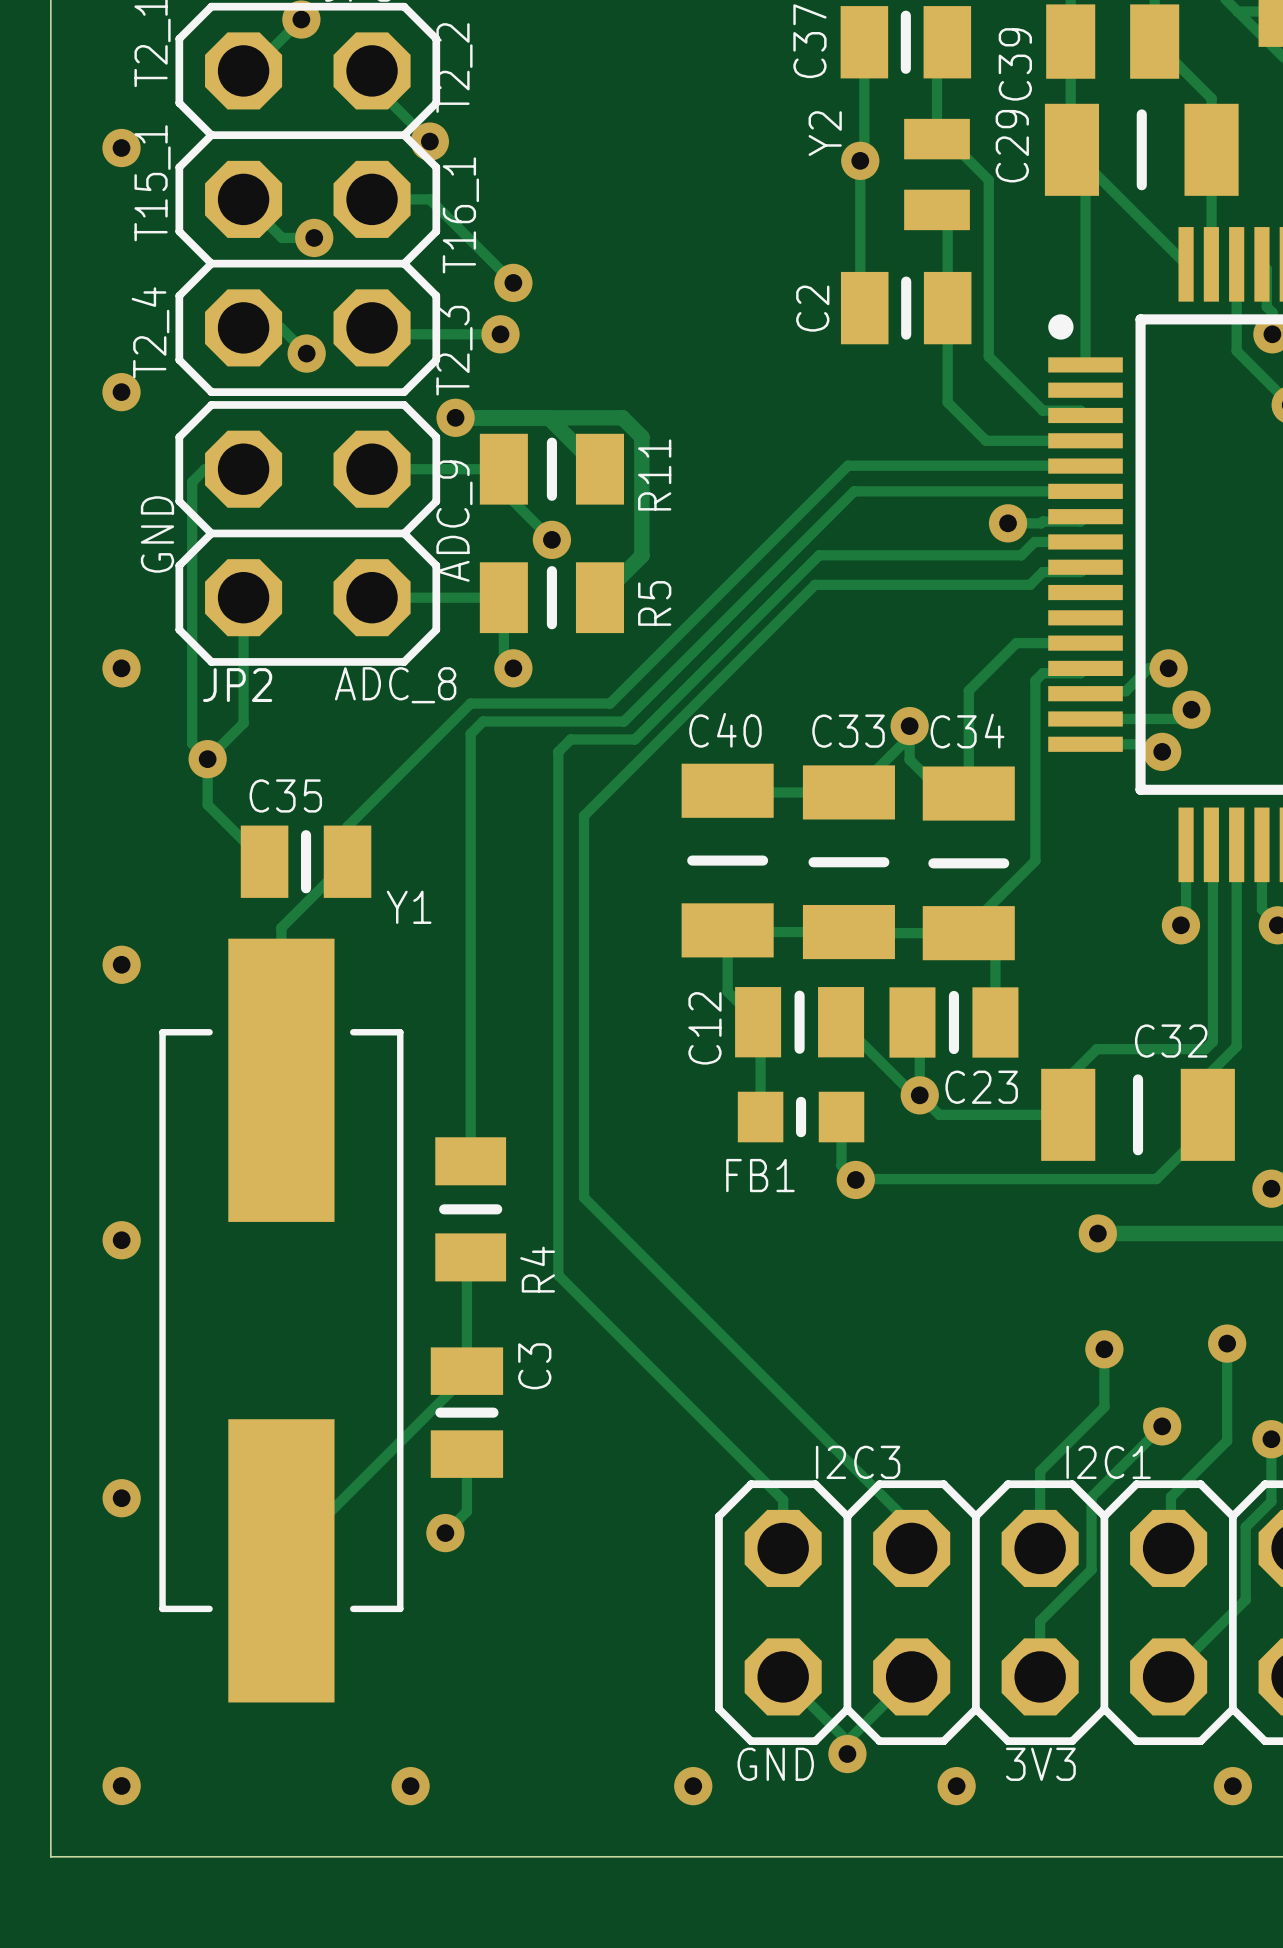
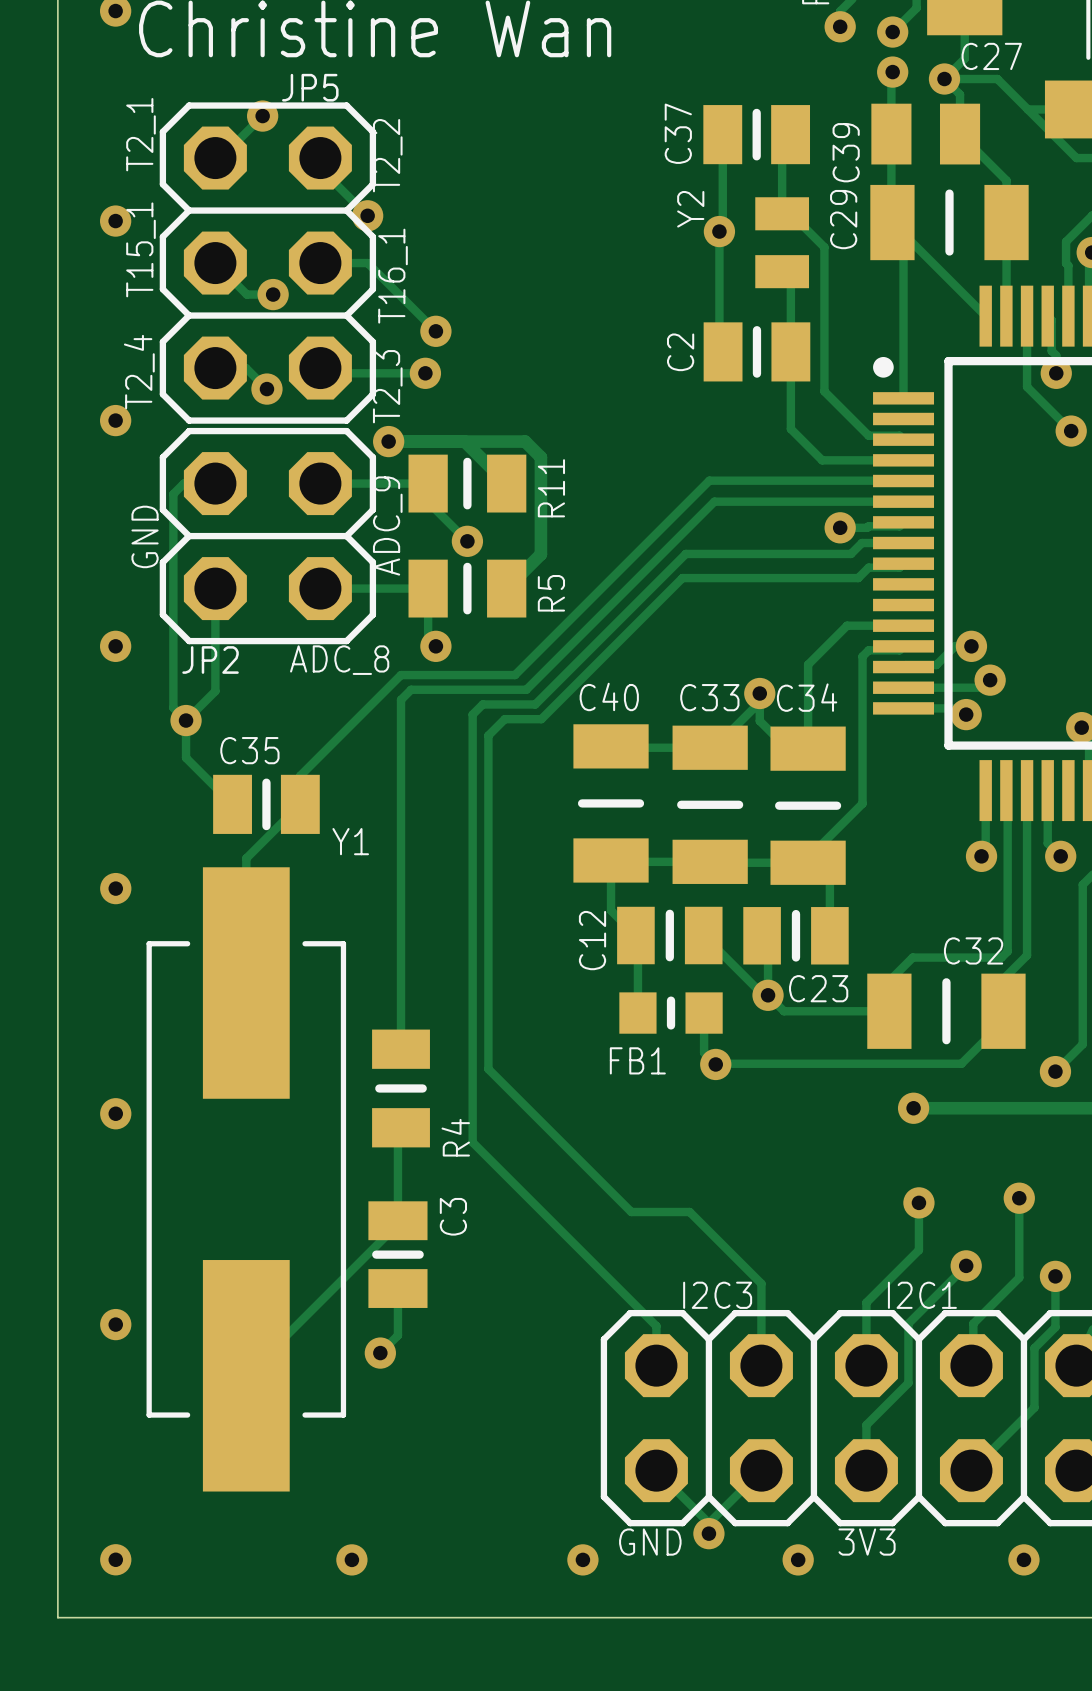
track: (642, 757) (584, 815) (584, 1197) (911, 1525) -> (541, 719) (504, 719) (488, 735) (488, 1069) (631, 1212) (689, 1212) (761, 1283) (761, 1346)

